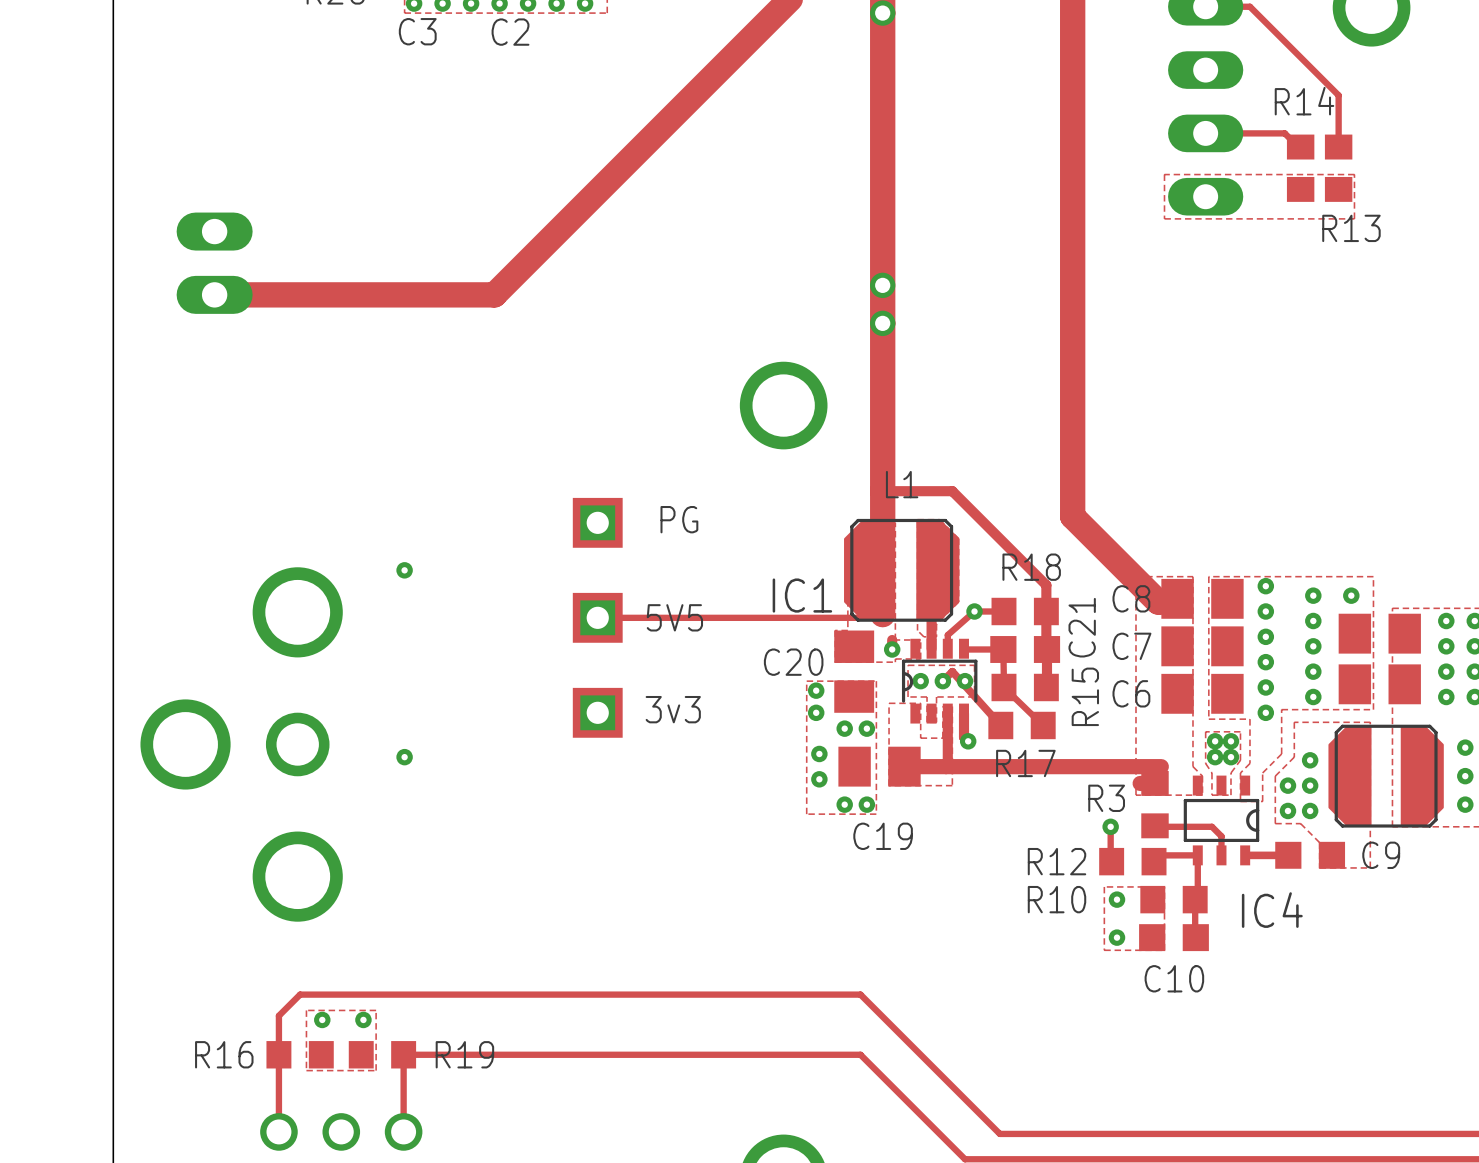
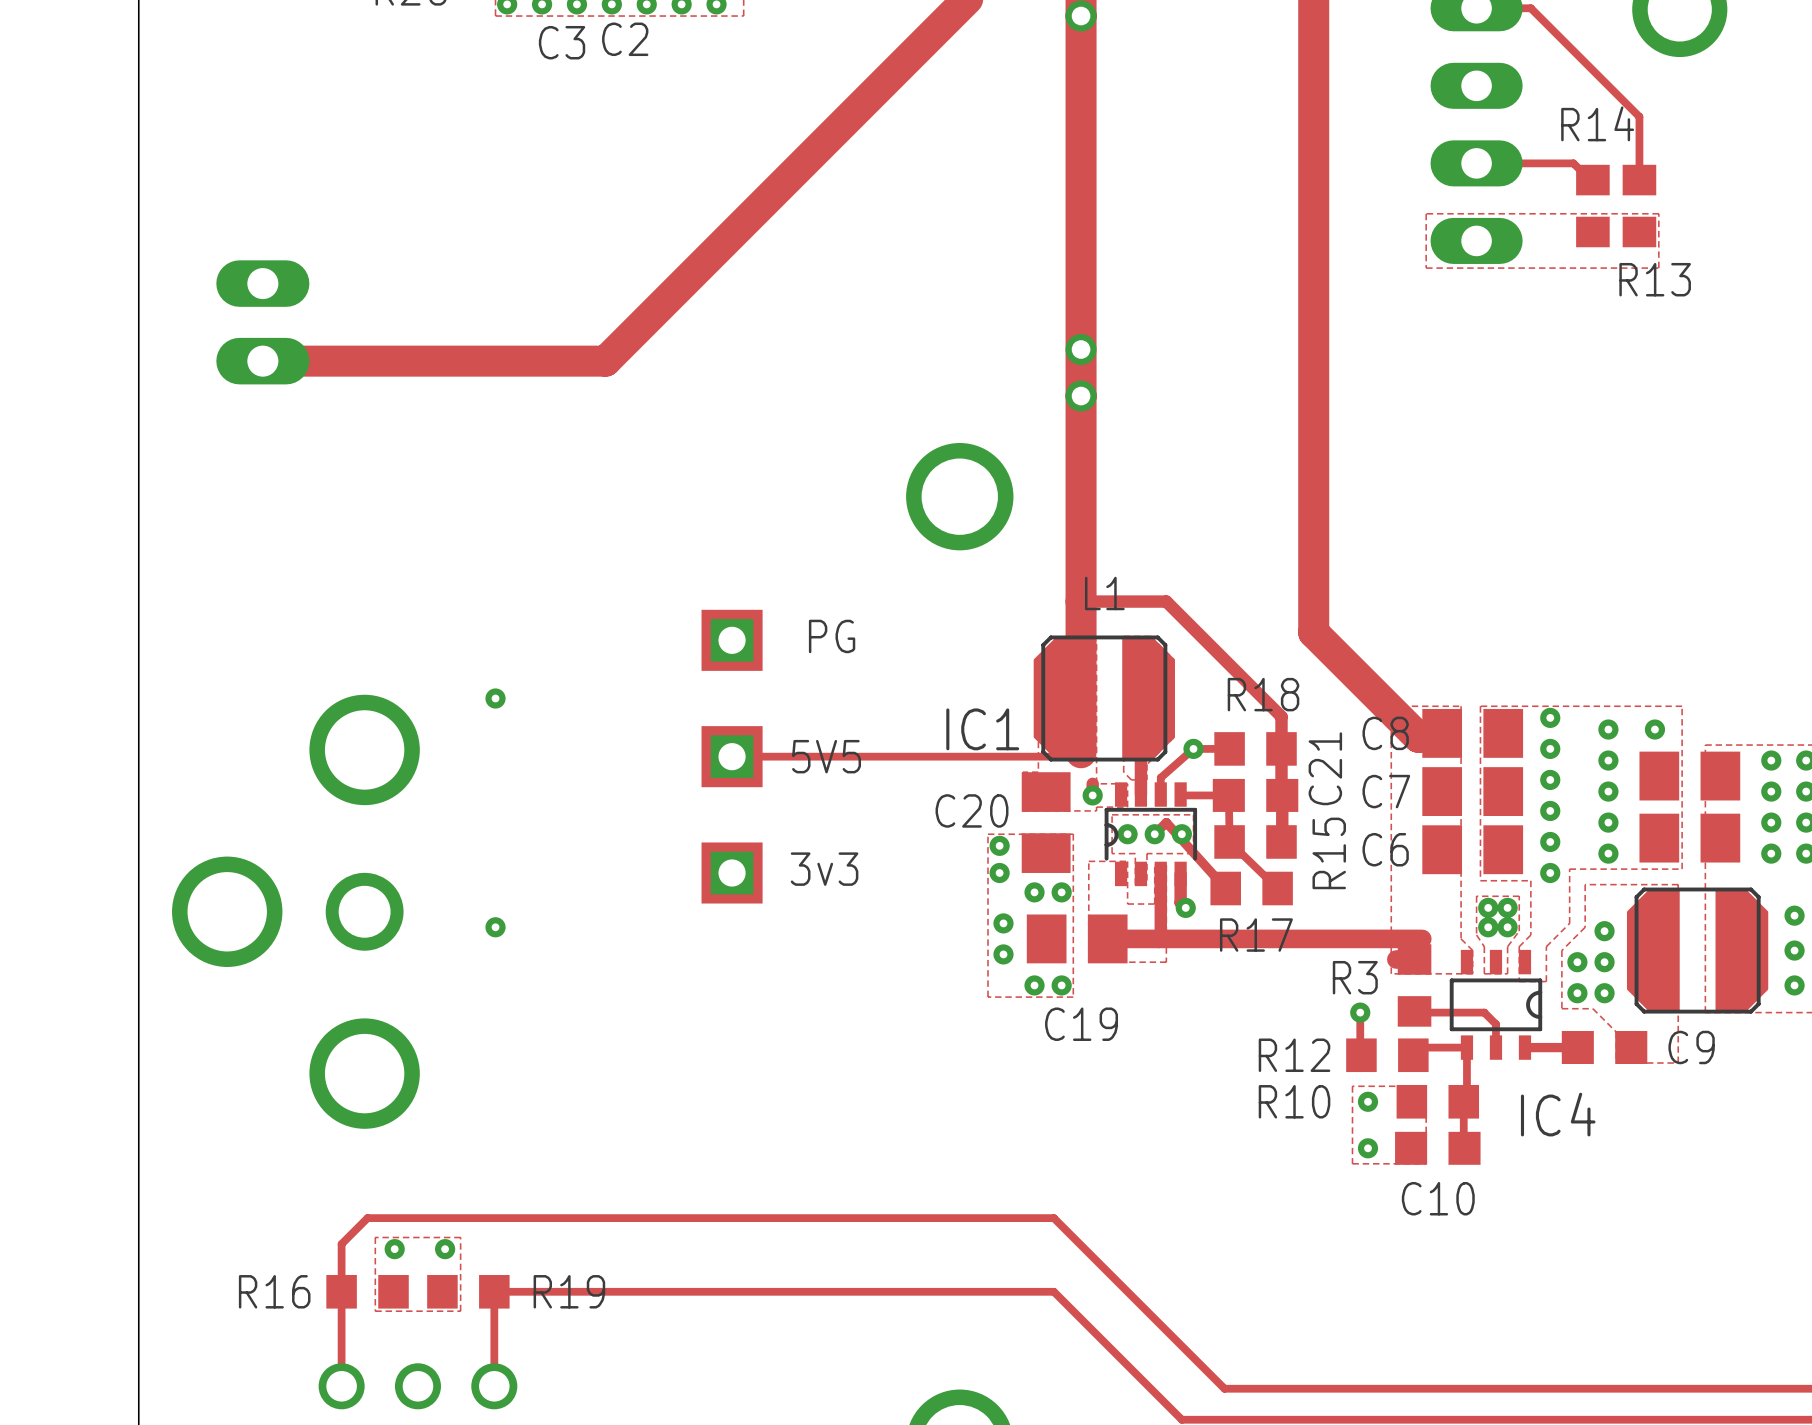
C3 name position: C3 (417, 31) -> C3 (562, 42)

